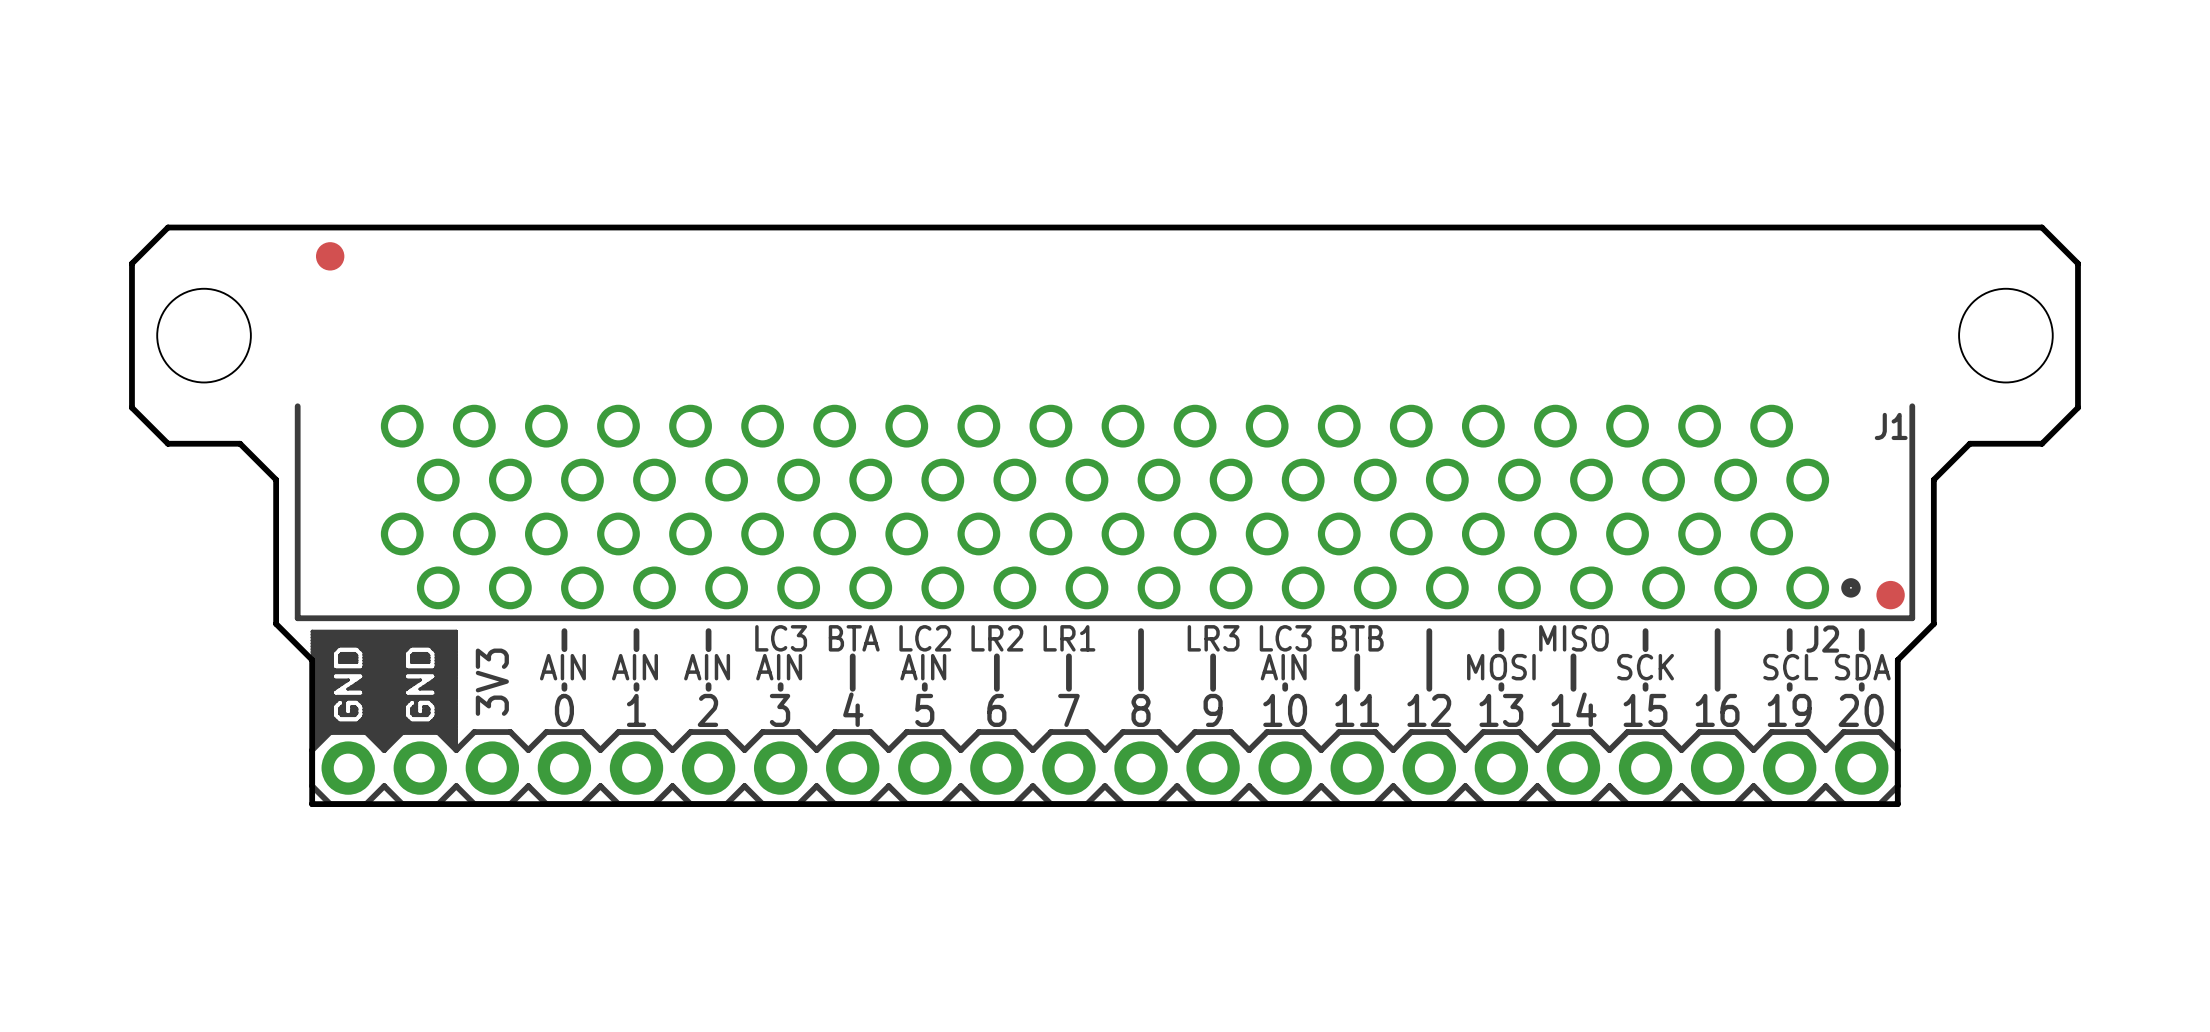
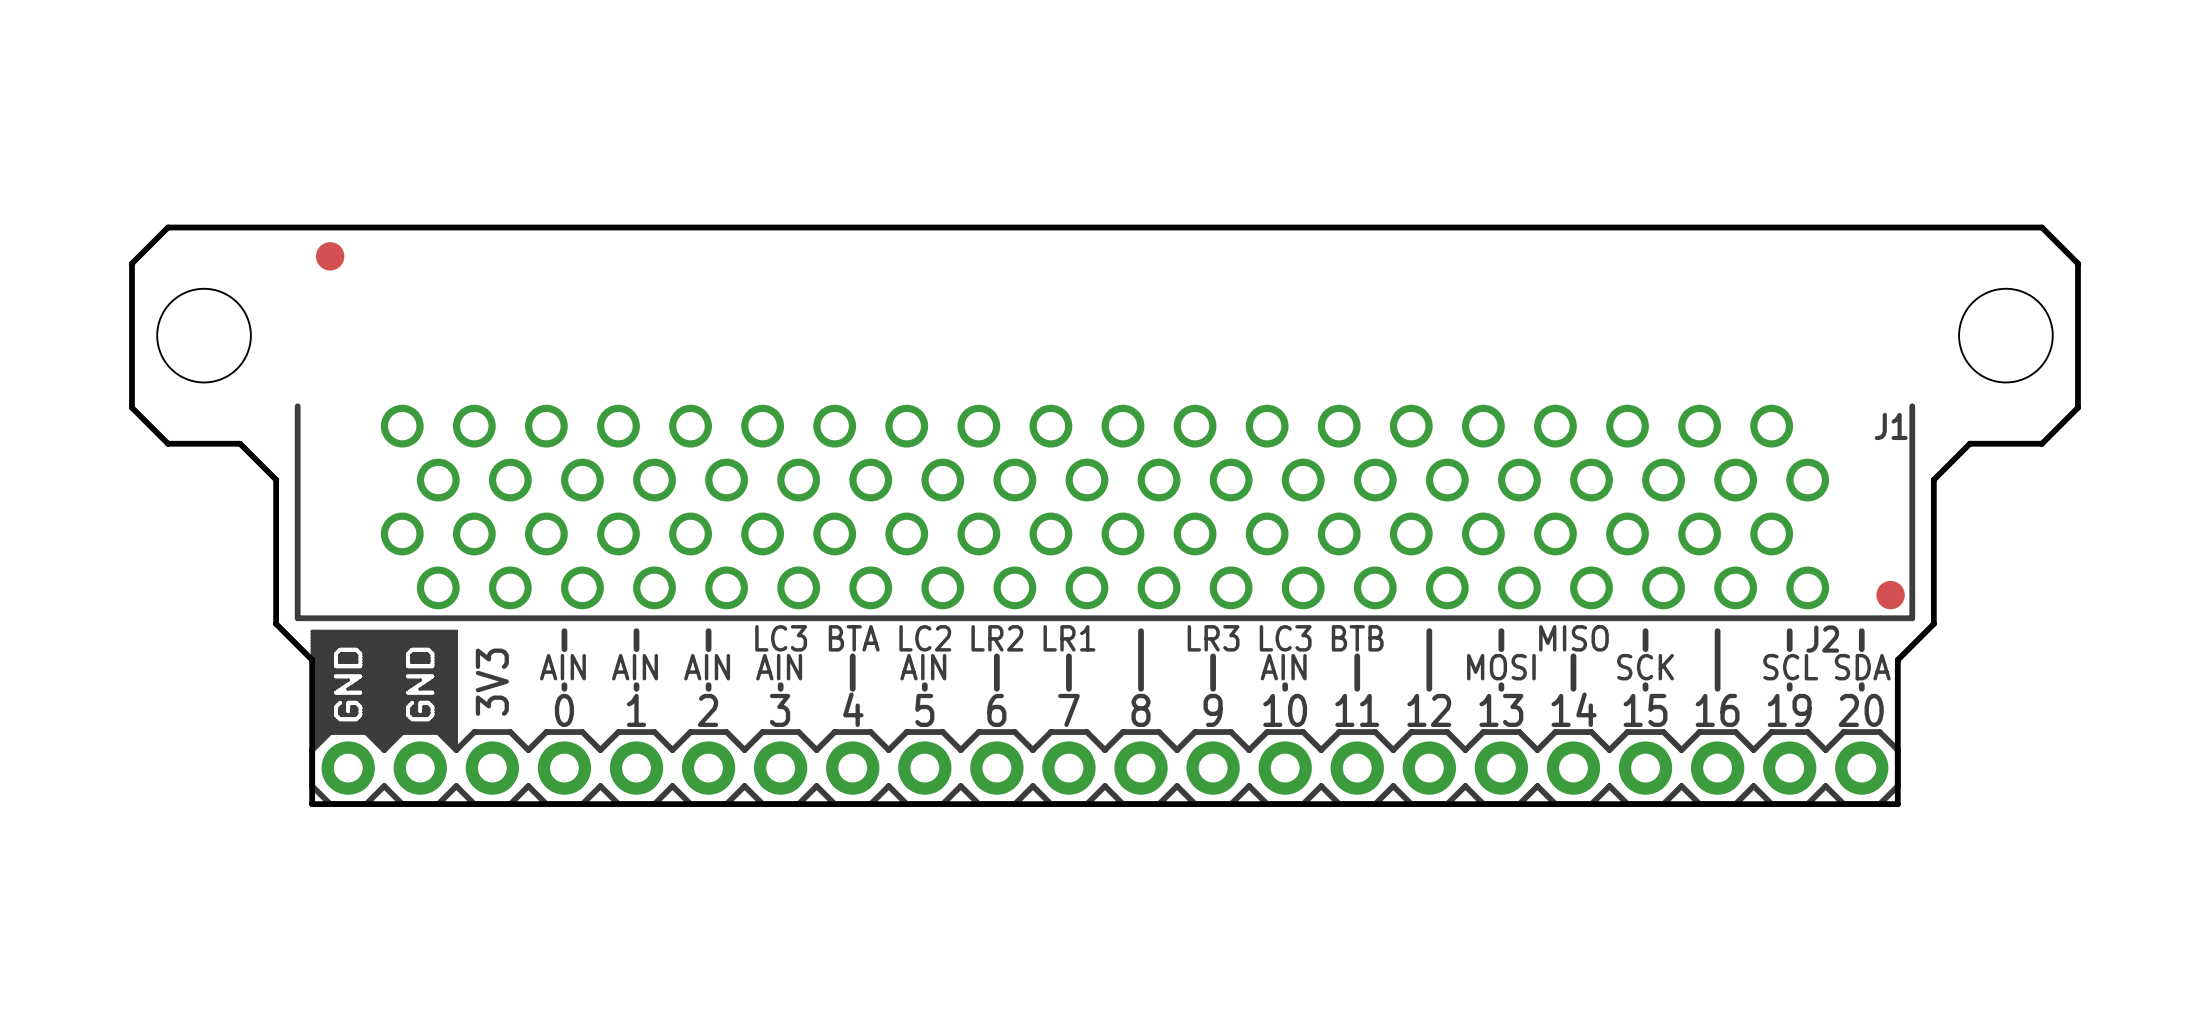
J1 footprint: [294, 403, 1916, 622] -> [294, 403, 1916, 622]

